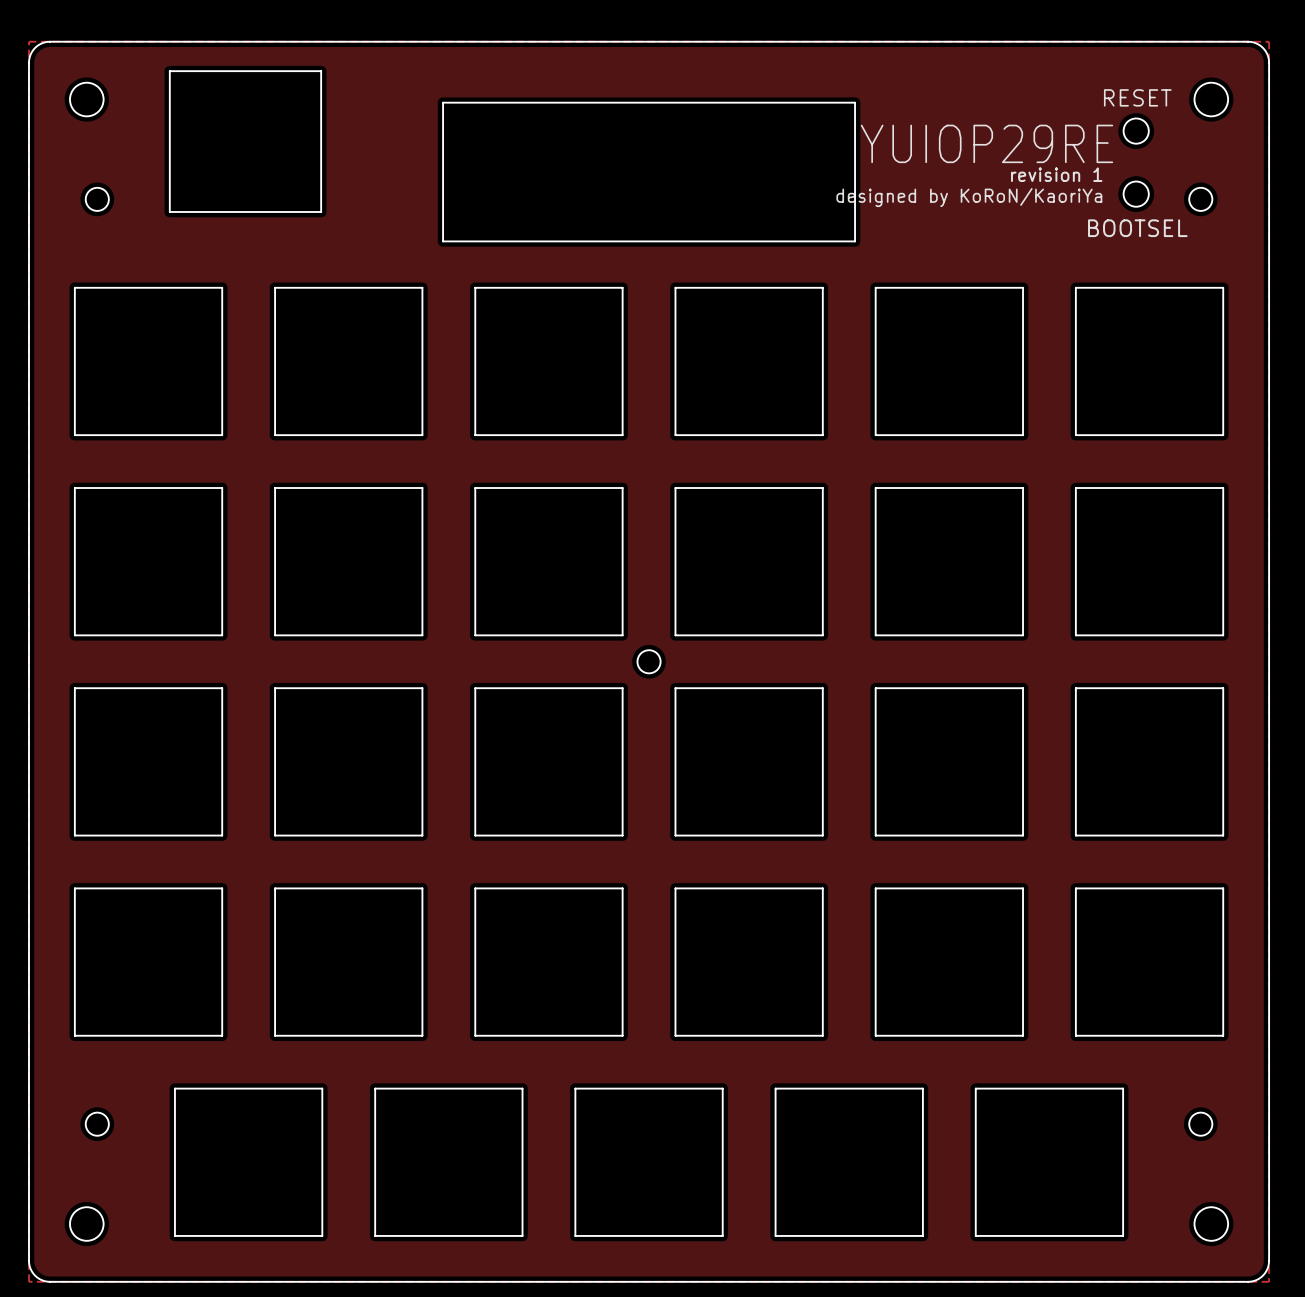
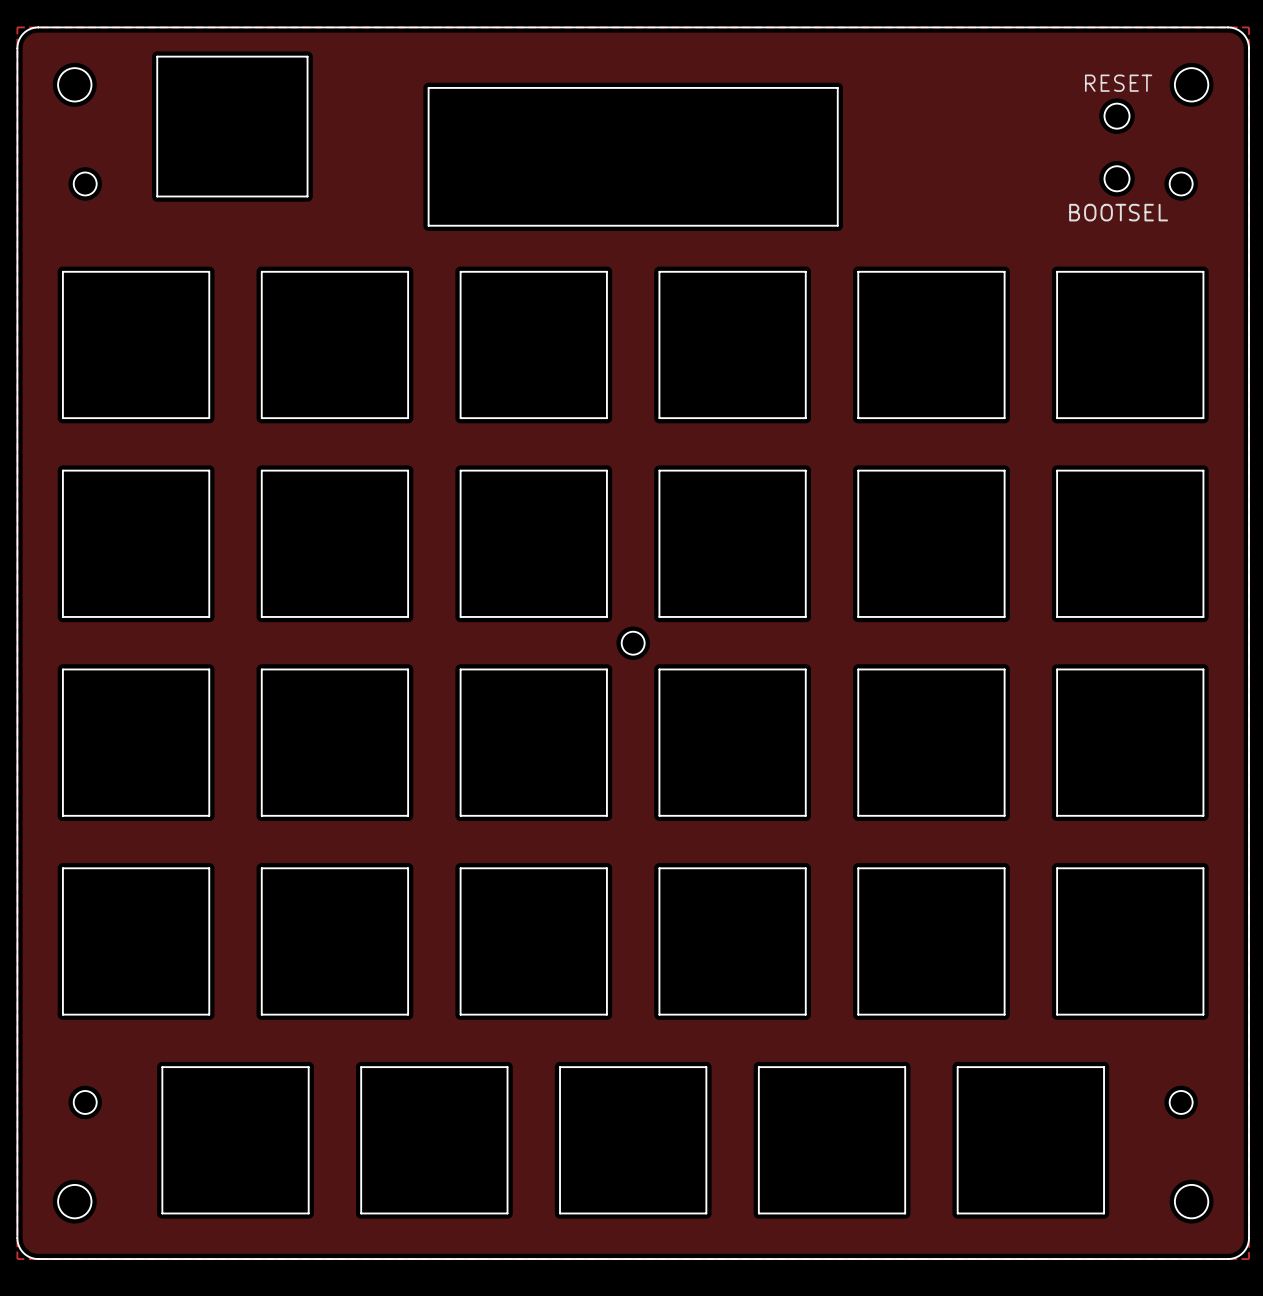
text: YUIOP29RE (986, 143) -> none
text: revision 1 (1056, 174) -> none
text: designed by KoRoN/KaoriYa (969, 197) -> none

